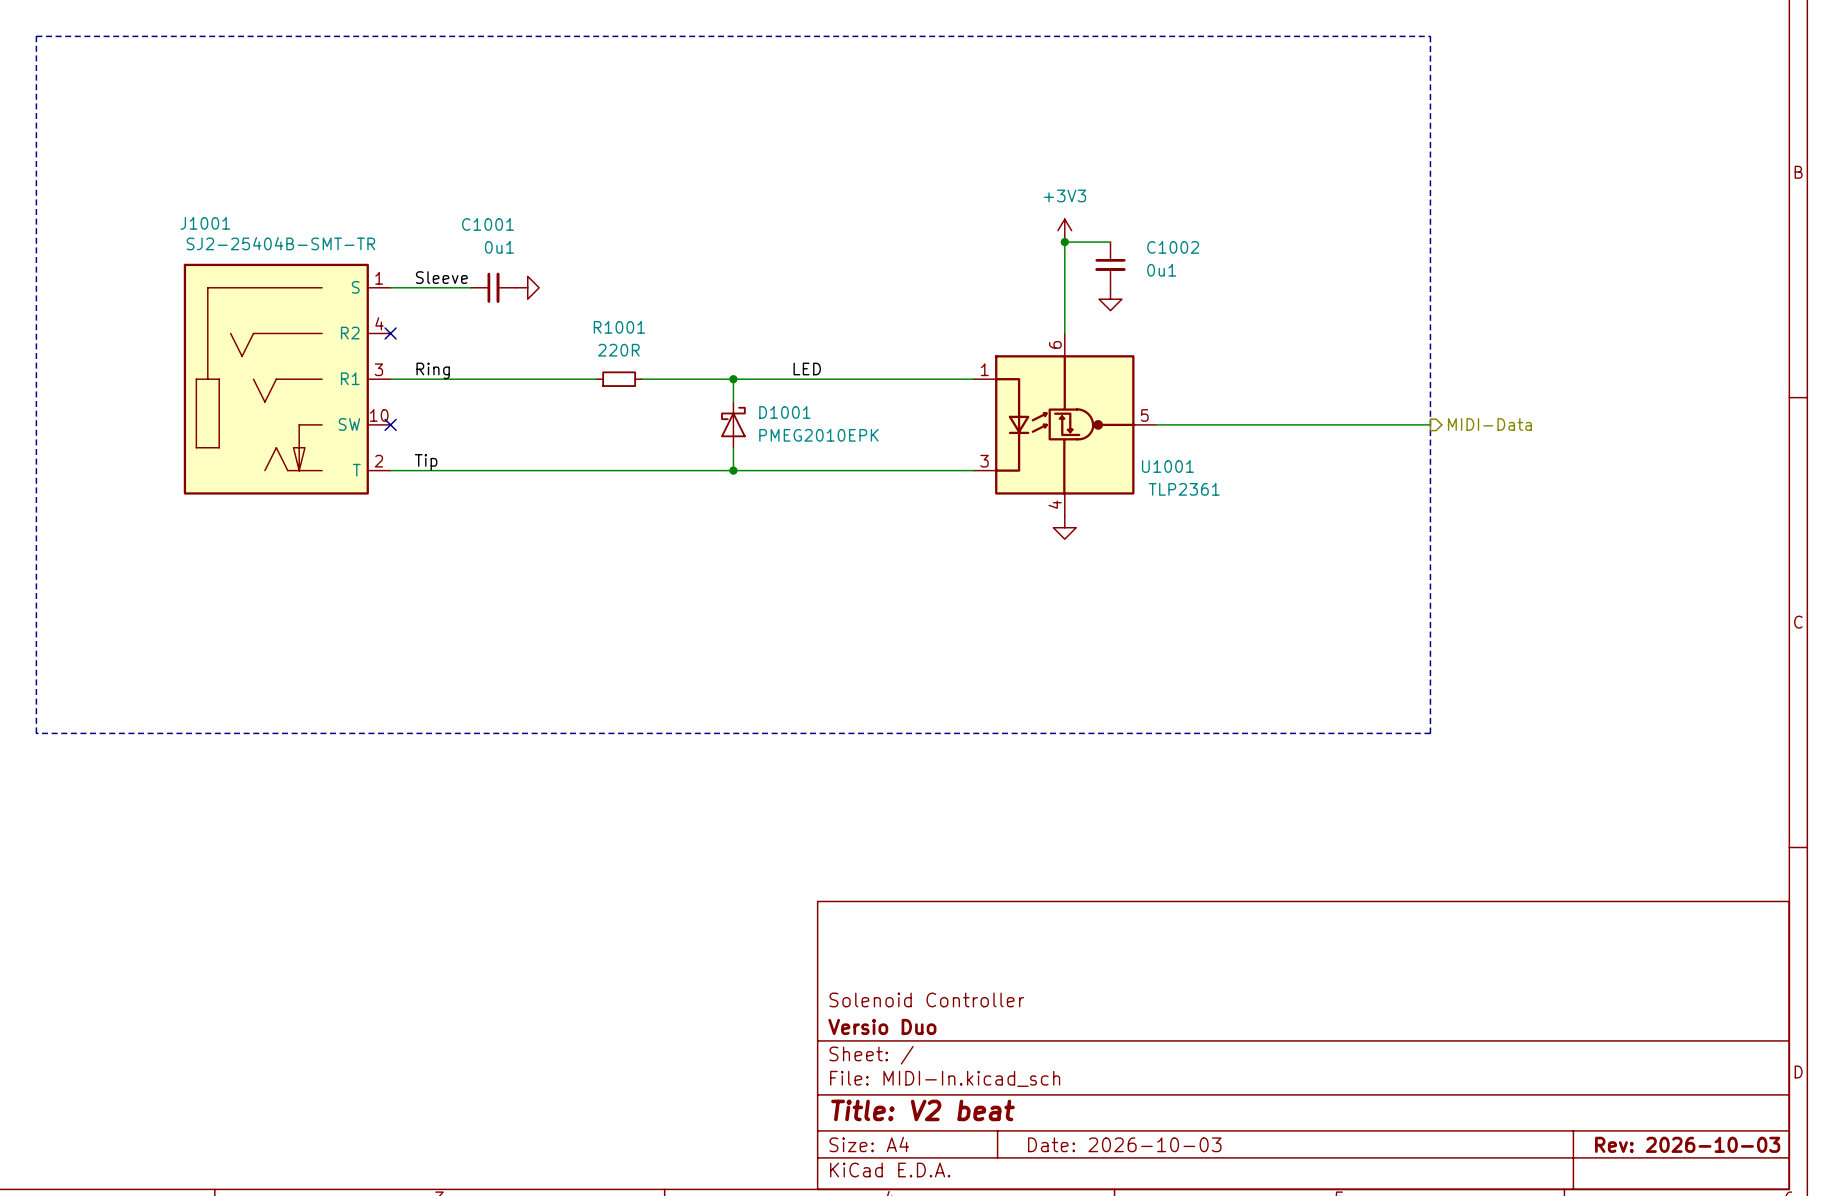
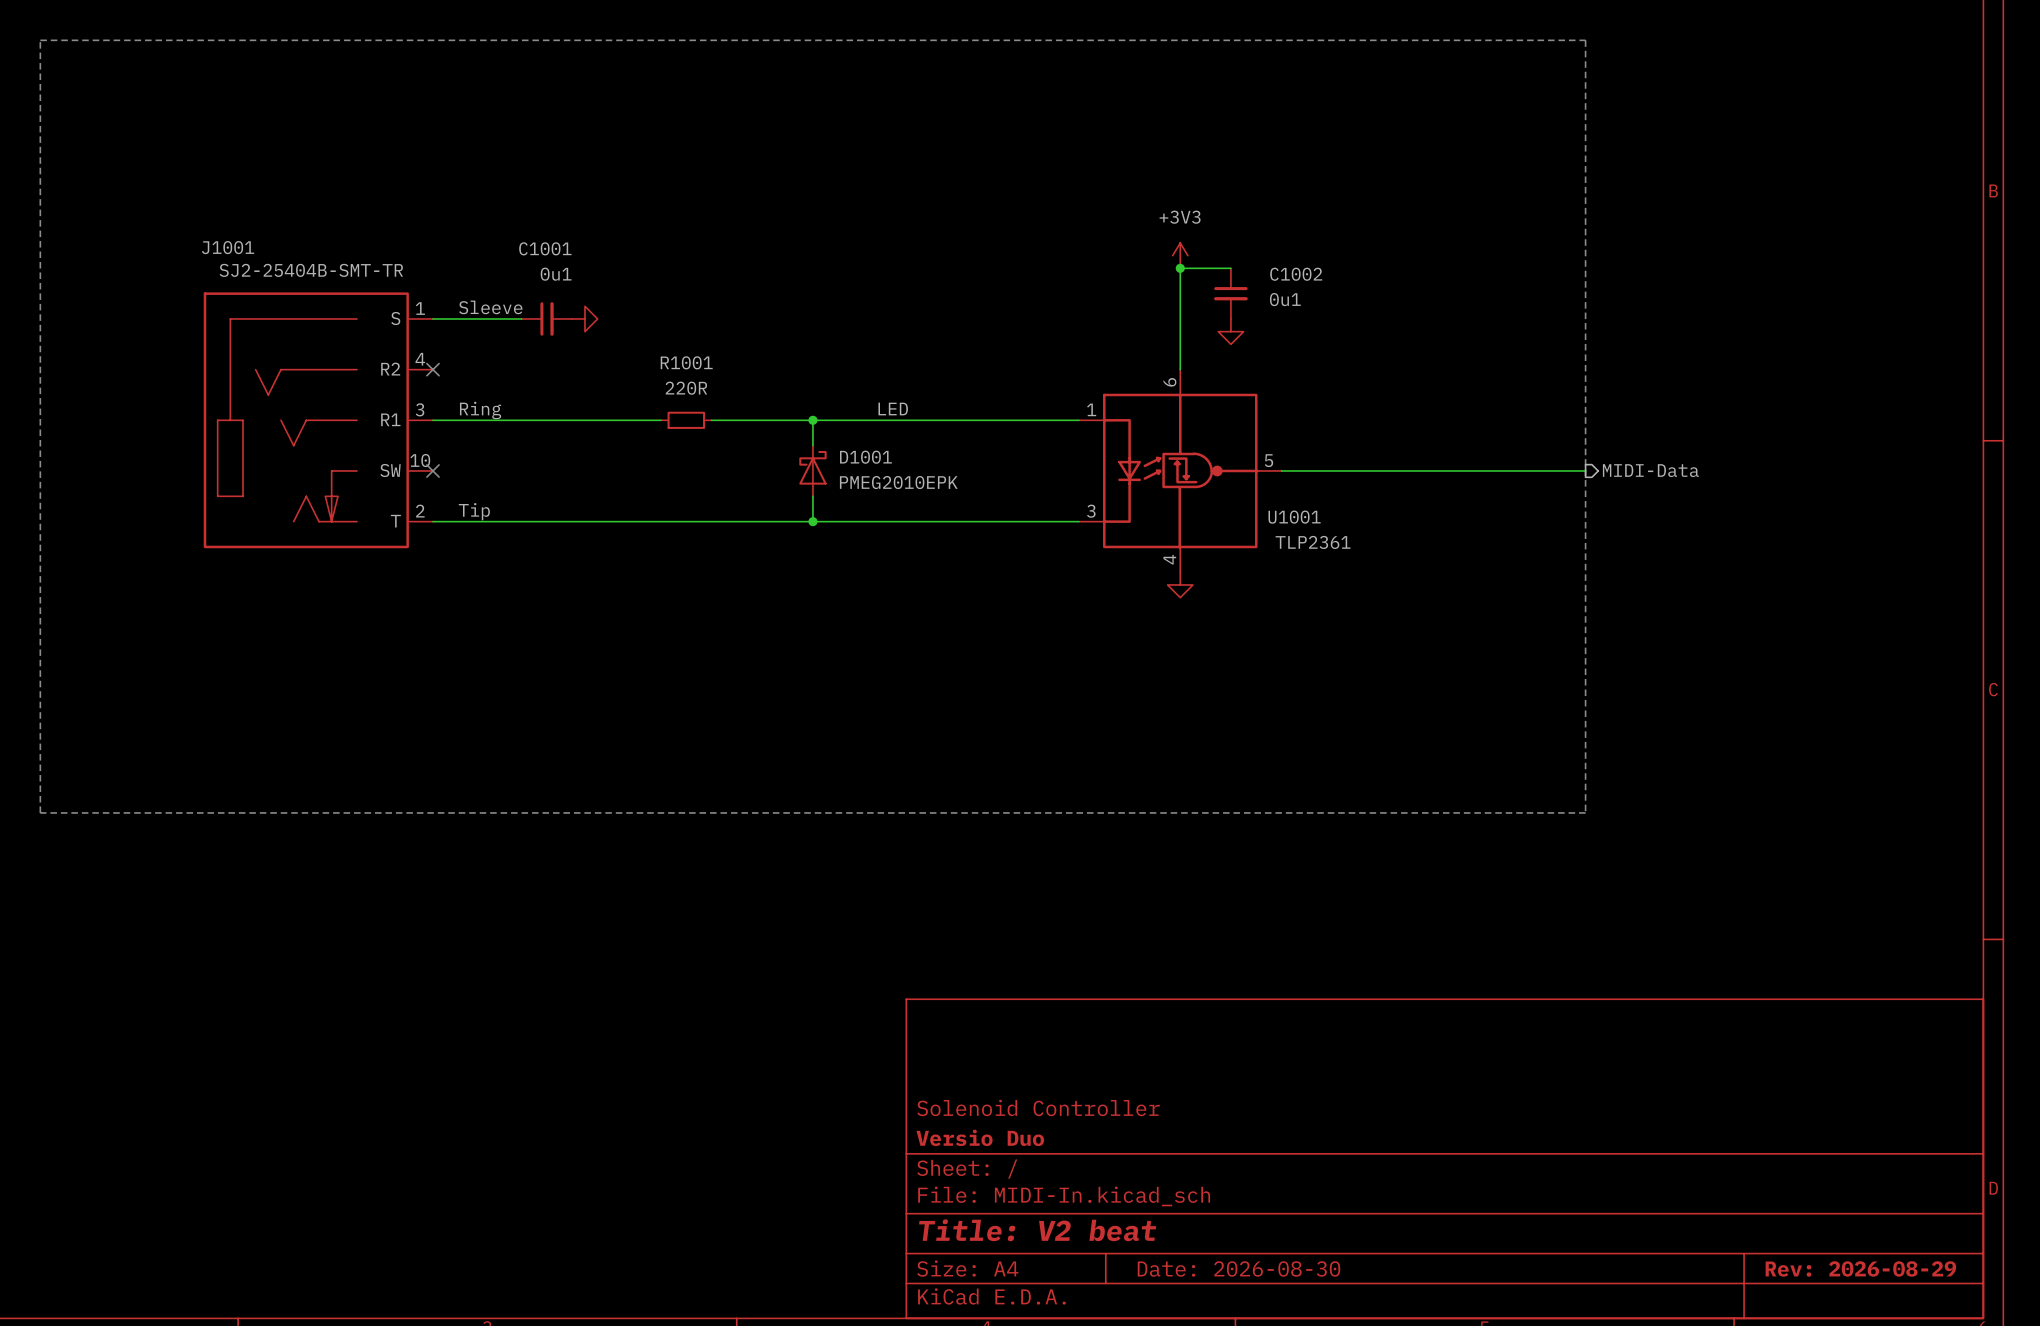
title block: Date: 2026-10-03 (1124, 1144) -> Date: 2026-08-30 (1238, 1268)
title block: Rev: 2026-10-03 (1687, 1144) -> Rev: 2026-08-29 (1860, 1268)

